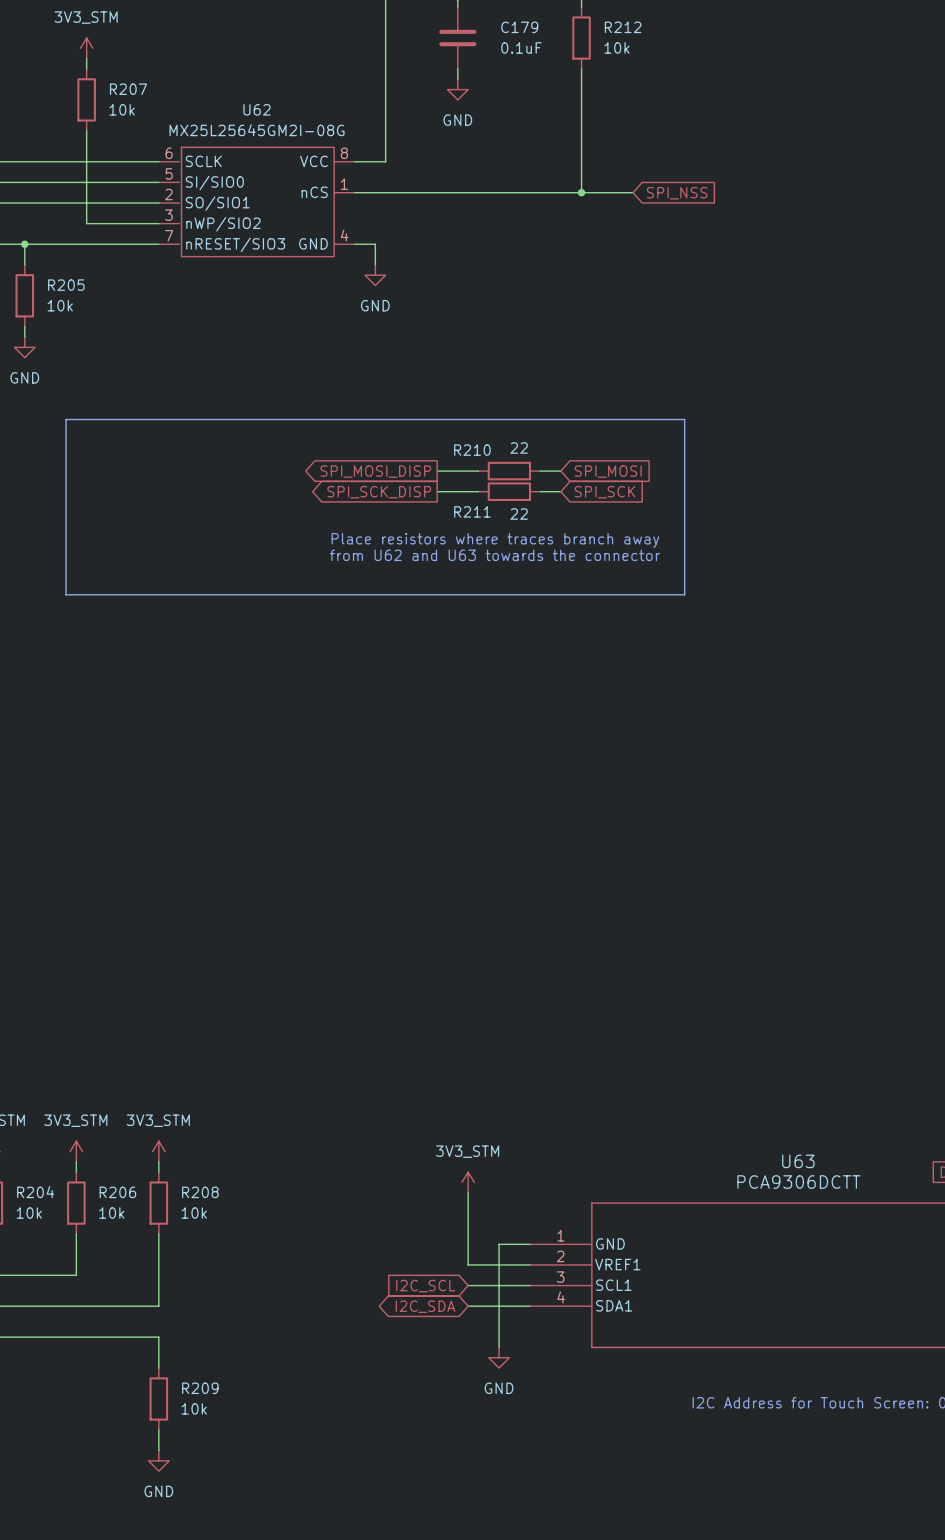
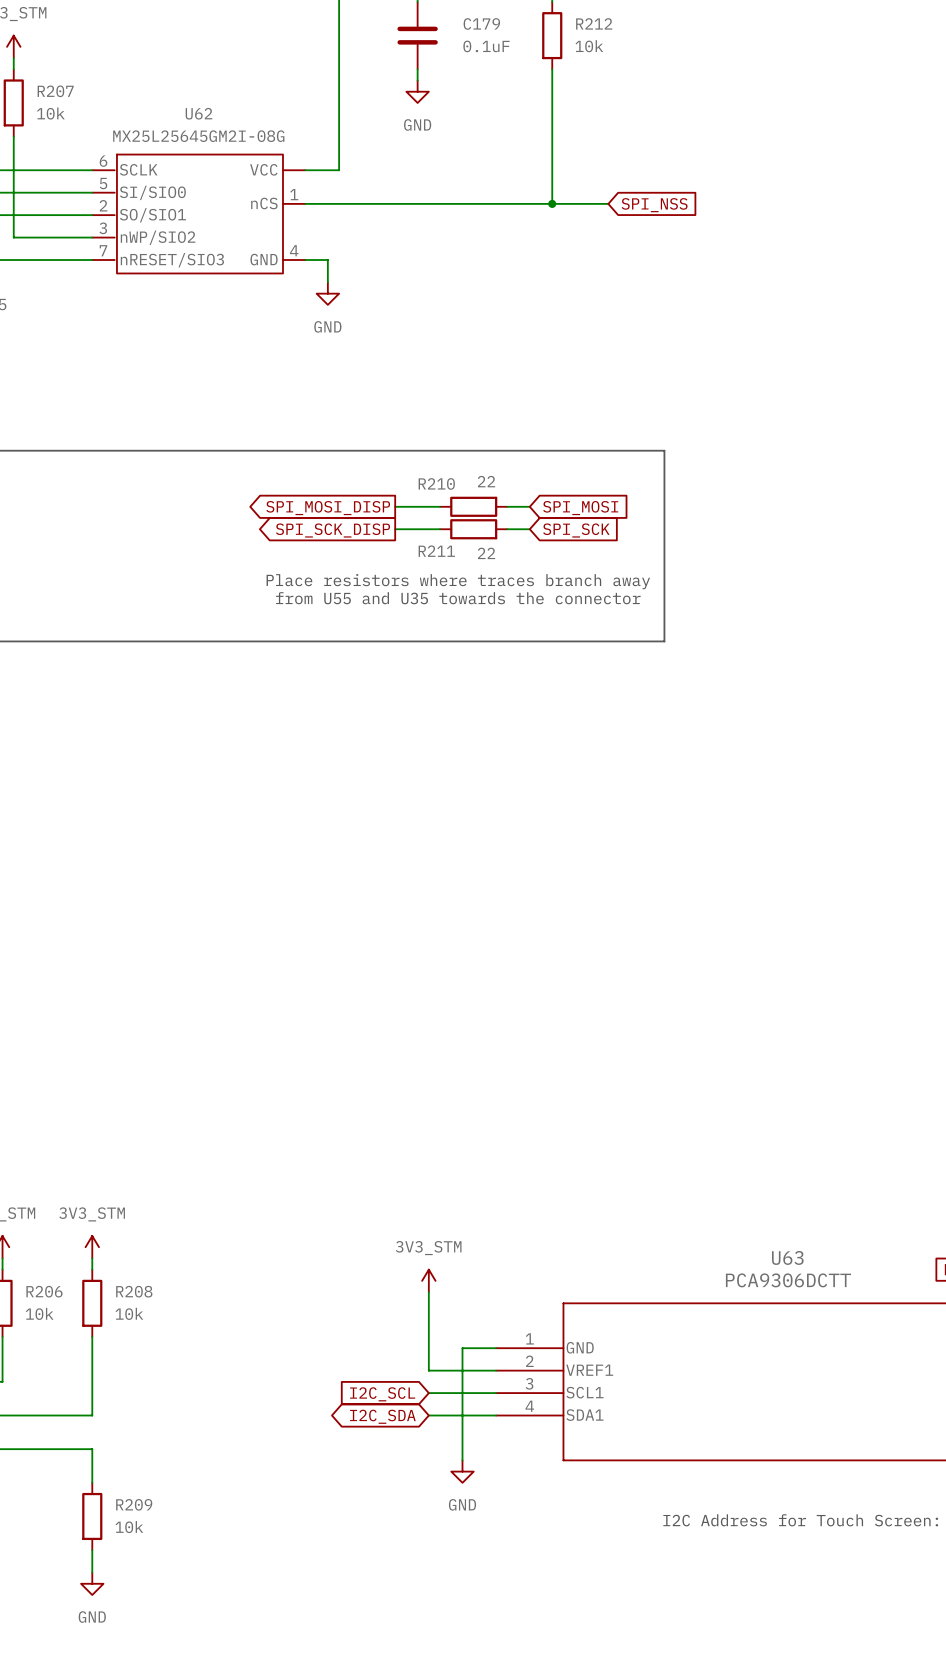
U62 pin number: 8 (344, 153) -> none
text: from U62 and U63 towards the connector (494, 555) -> from U55 and U35 towards the connector (458, 598)

